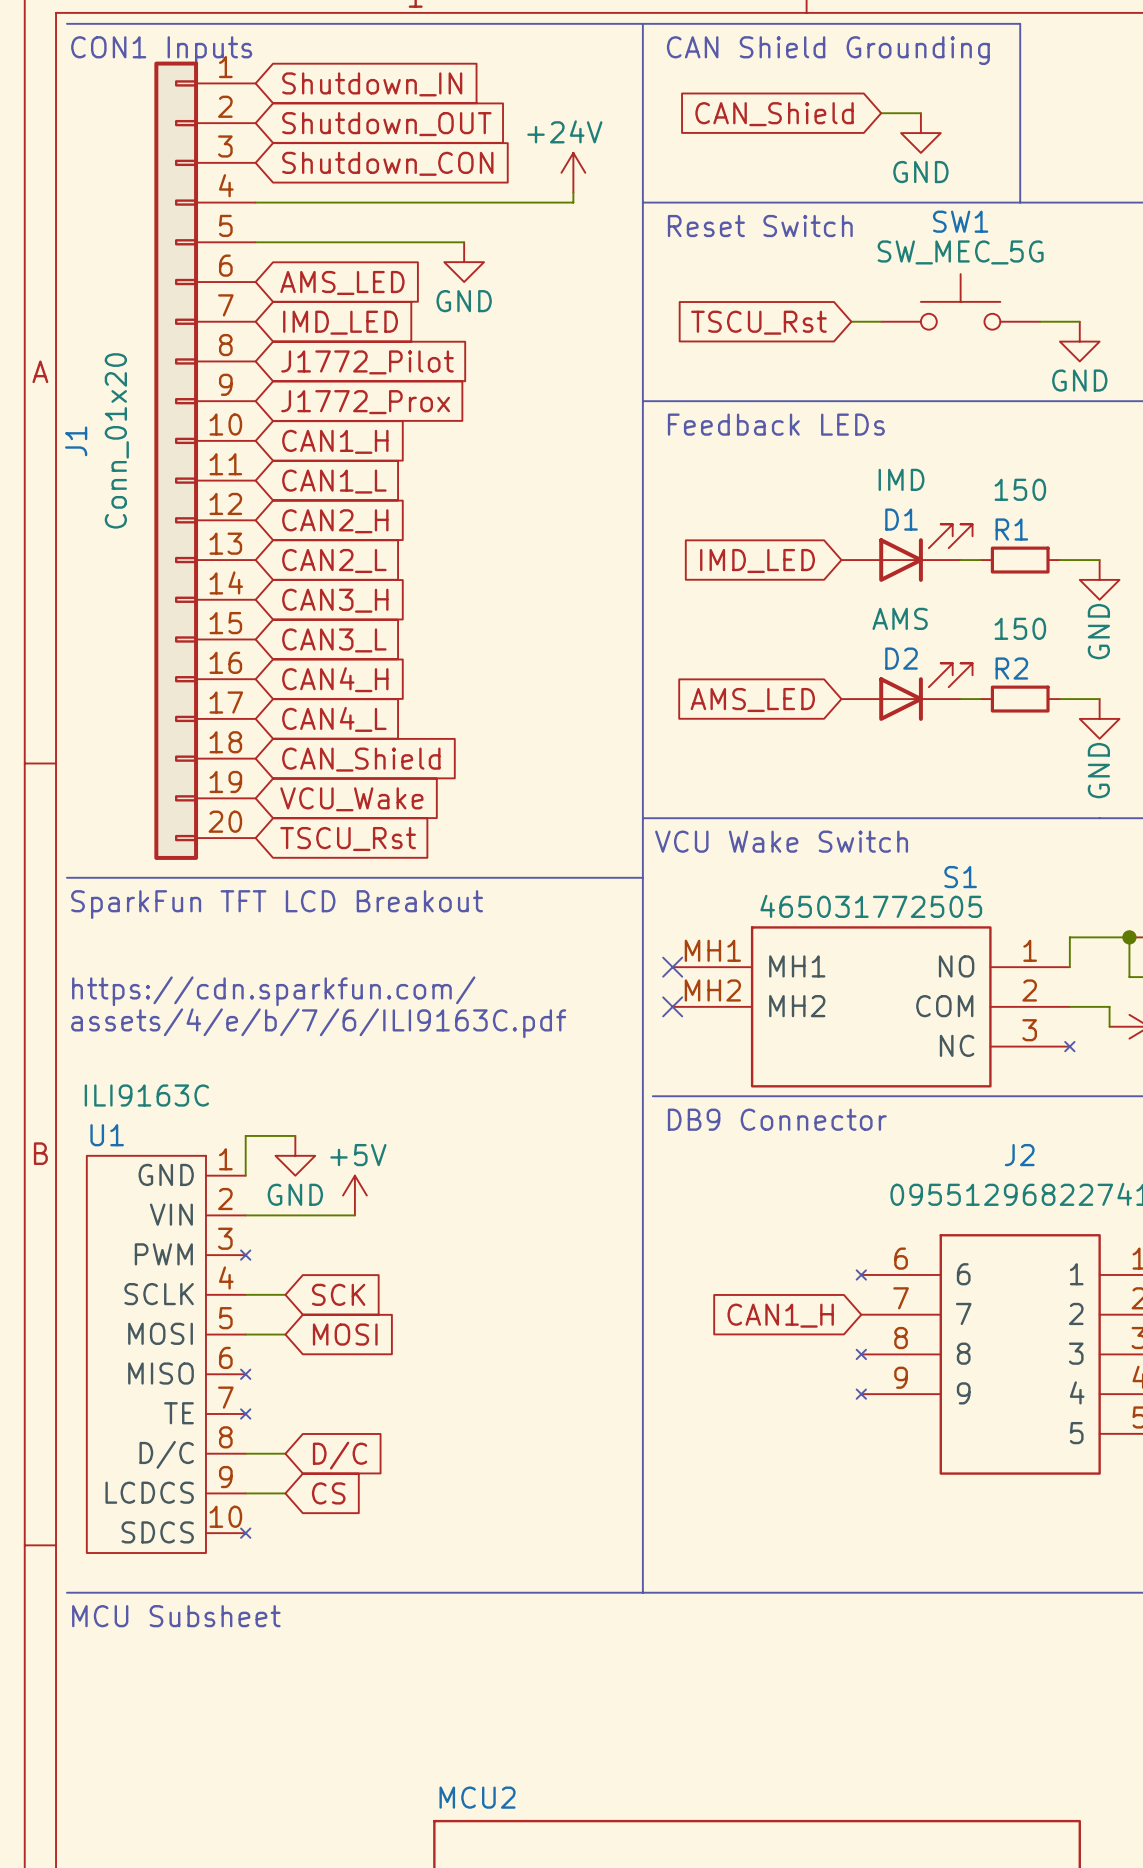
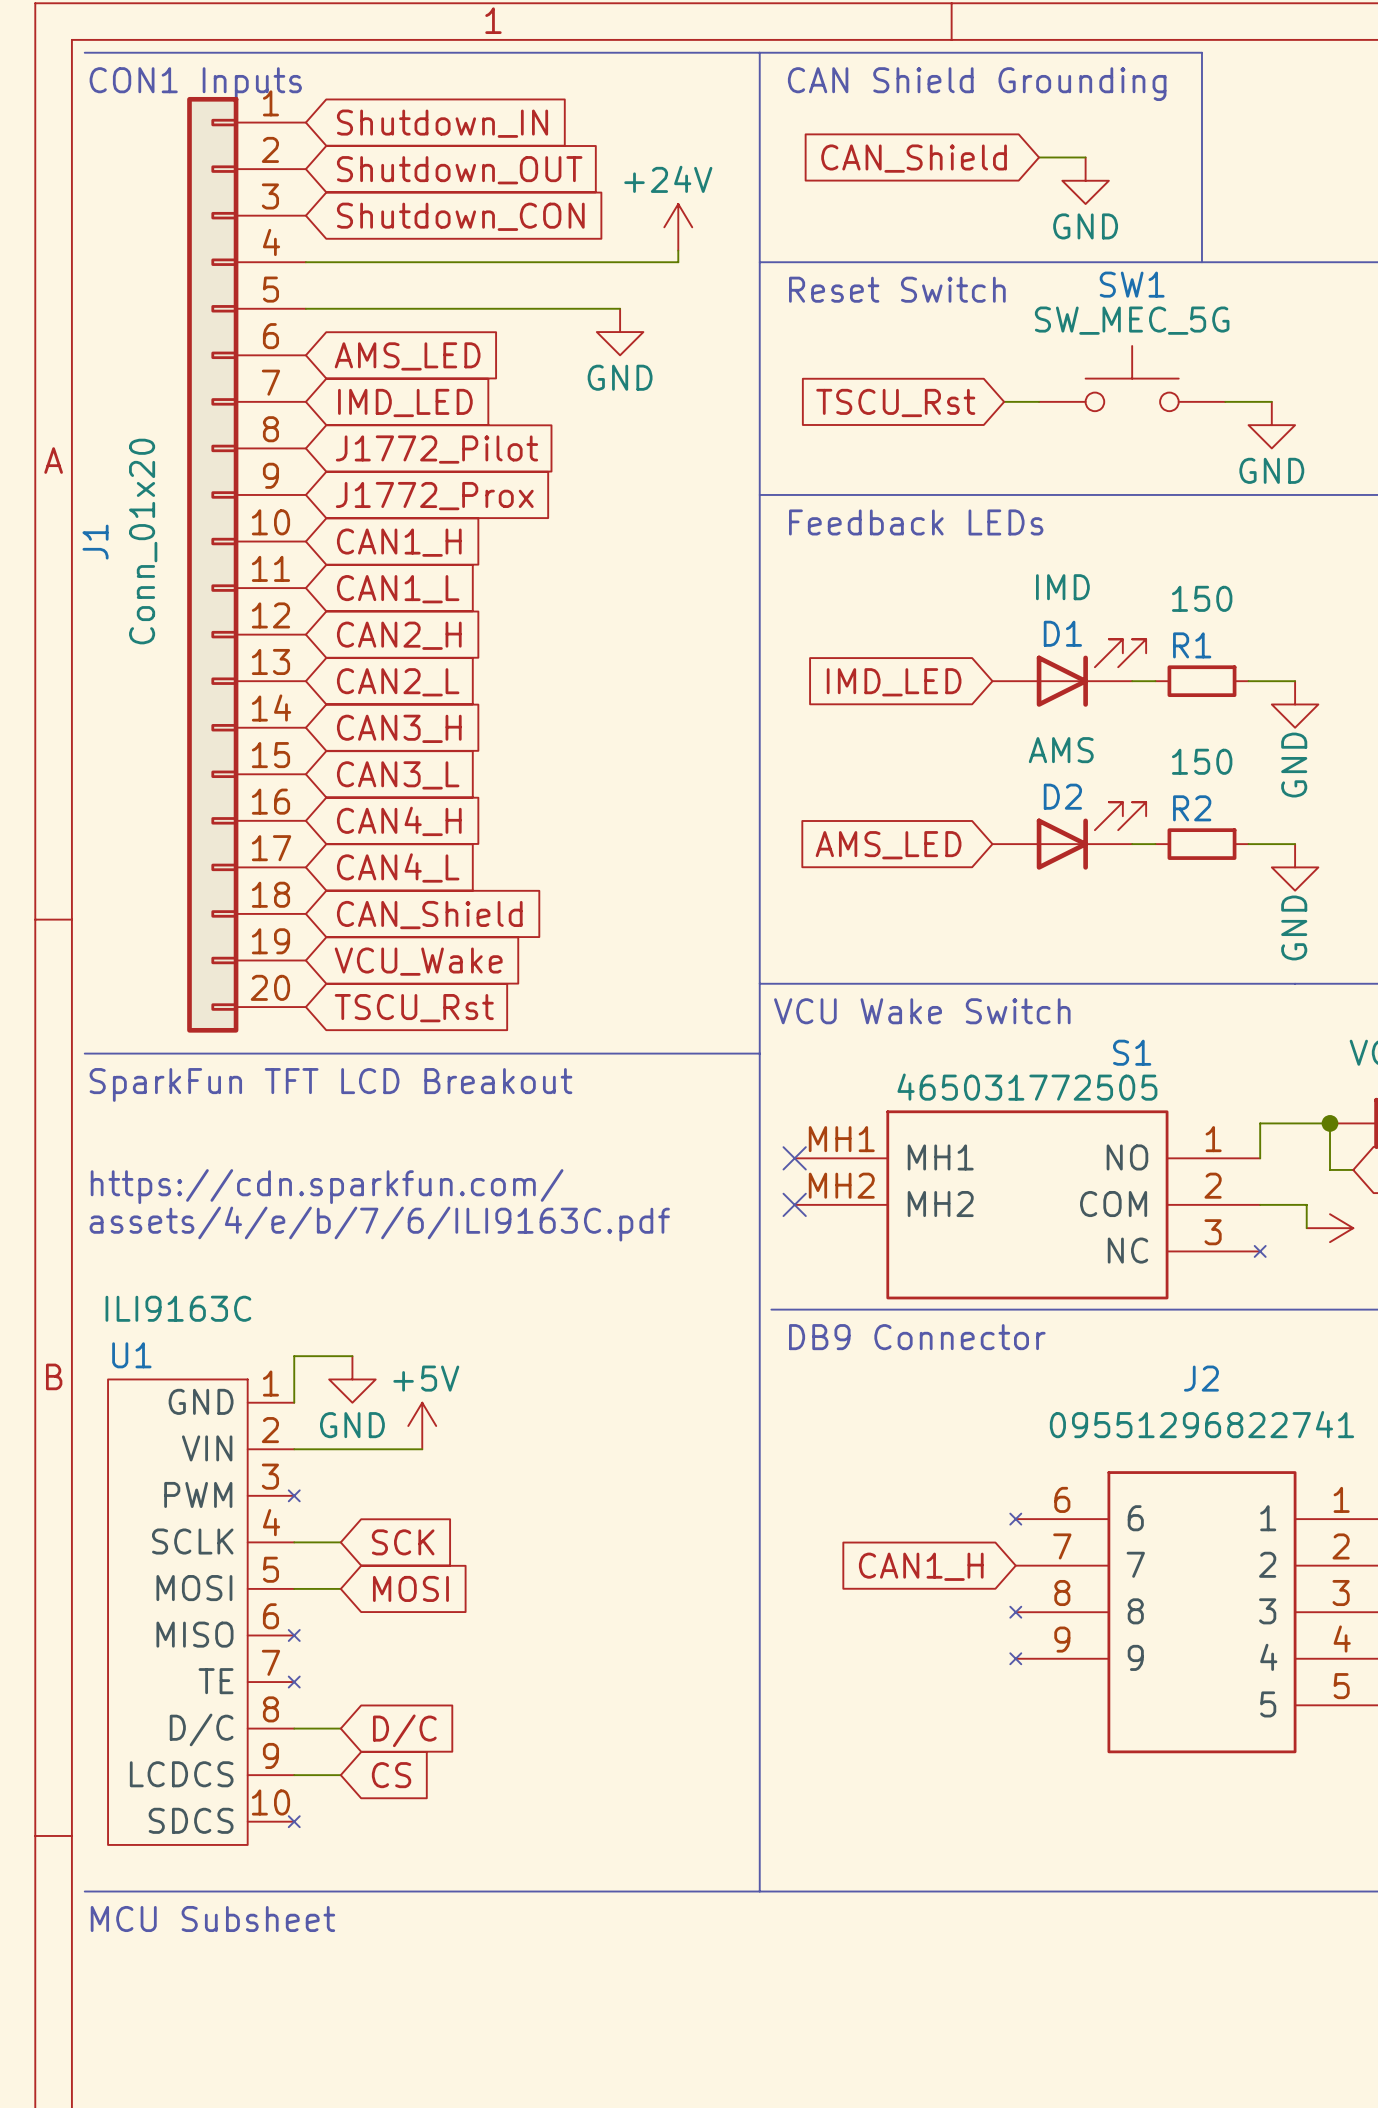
wire: none -> (550, 308) (620, 308)
power symbol position: GND (464, 262) -> GND (620, 332)

